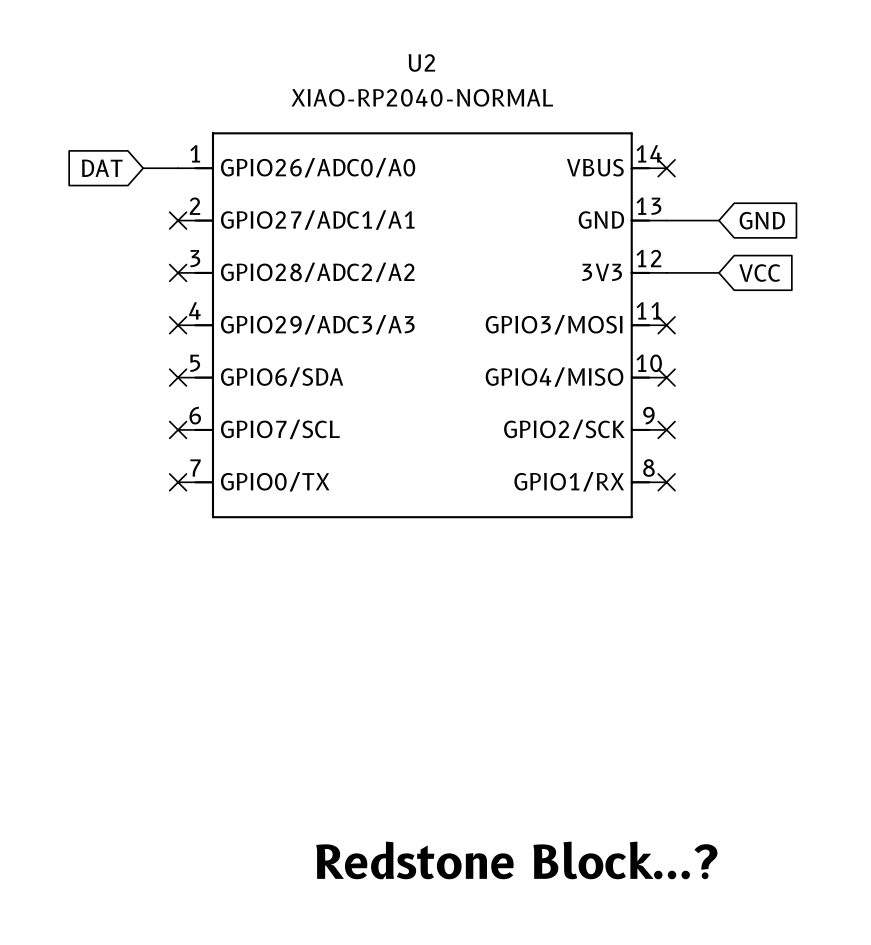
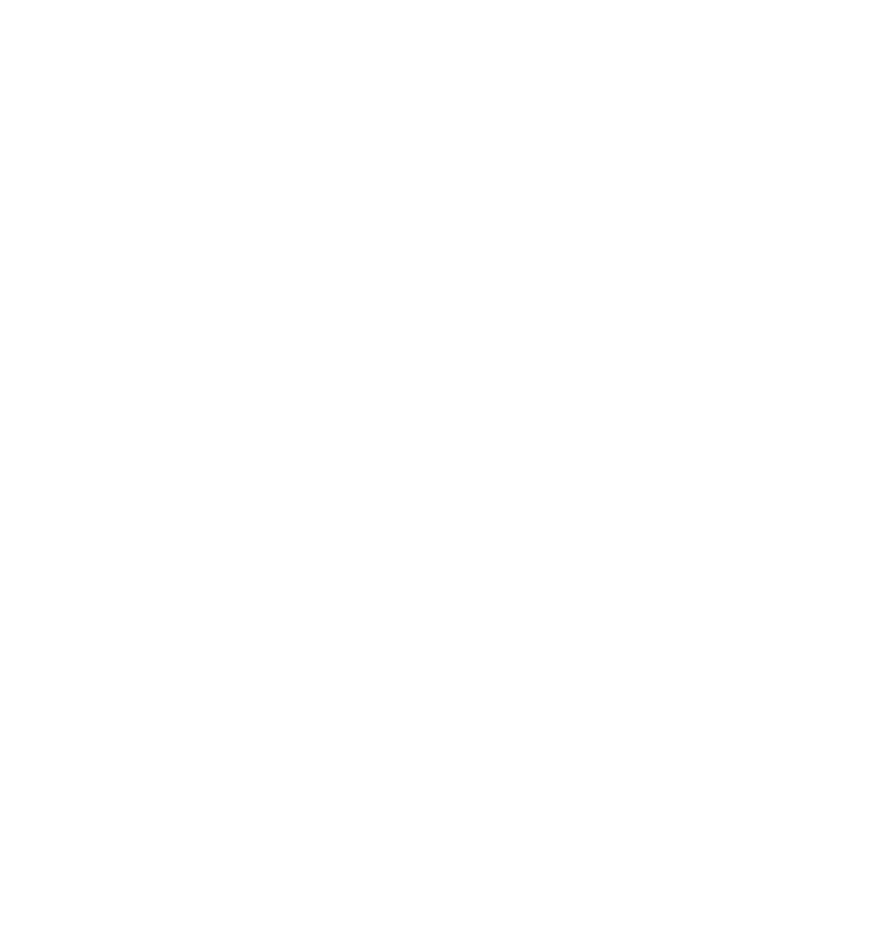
global label: DAT (102, 168) -> none
wire: (143, 168) (178, 168) -> none
no-connect mark: (666, 168) -> none
no-connect mark: (178, 220) -> none
wire: (666, 220) (718, 220) -> none
global label: GND (762, 220) -> none
no-connect mark: (178, 272) -> none
wire: (666, 272) (718, 272) -> none
global label: VCC (759, 273) -> none
no-connect mark: (178, 325) -> none
U2: XIAO-RP2040-NORMAL (422, 325) -> none
no-connect mark: (666, 325) -> none
no-connect mark: (178, 377) -> none
no-connect mark: (666, 377) -> none
no-connect mark: (178, 429) -> none
no-connect mark: (666, 429) -> none
no-connect mark: (178, 482) -> none
no-connect mark: (666, 482) -> none
text: Redstone Block...? (516, 860) -> none

